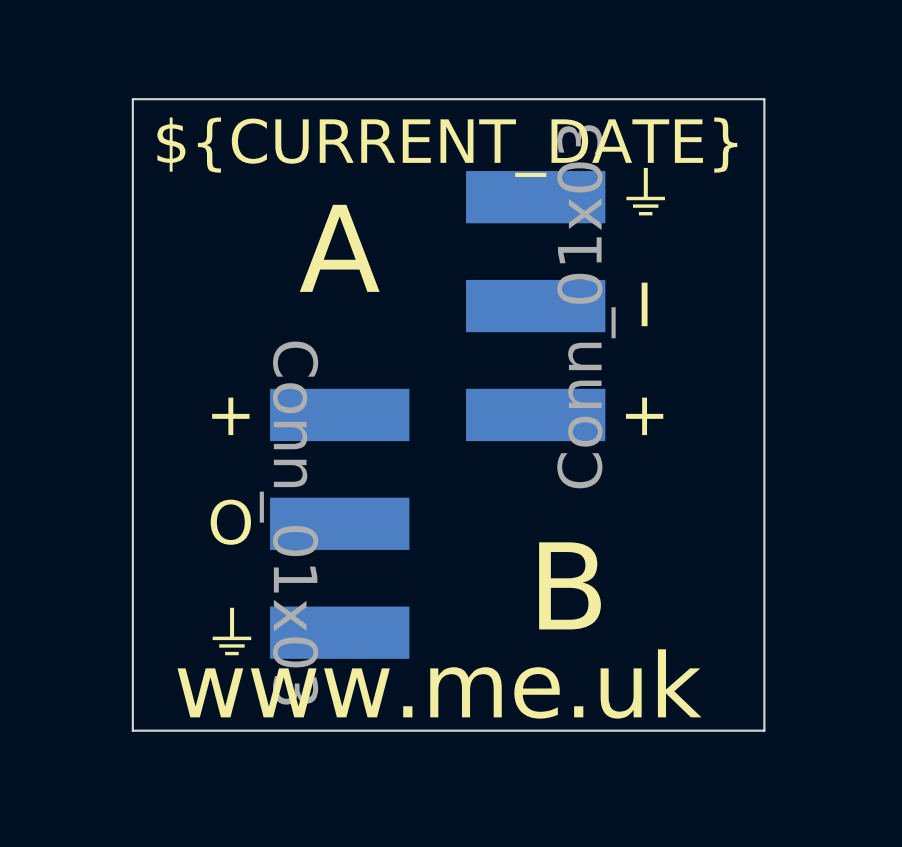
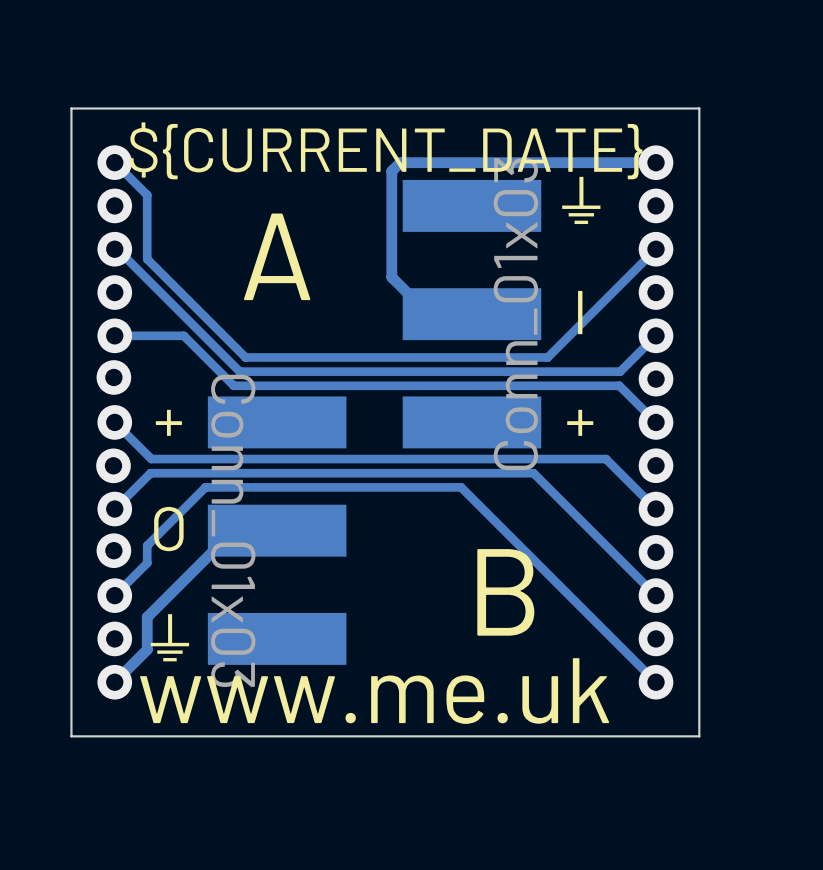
track: none -> (114, 162) (147, 195) (147, 259) (245, 357) (547, 357) (656, 249)
via: none -> (114, 162)
track: none -> (656, 162) (400, 162) (391, 171) (391, 277) (428, 314) (471, 314)
via: none -> (656, 162)
via: none -> (114, 205)
via: none -> (656, 205)
track: none -> (114, 249) (117, 249) (239, 371) (620, 371) (656, 335)
via: none -> (114, 249)
via: none -> (656, 249)
via: none -> (114, 292)
via: none -> (656, 292)
track: none -> (114, 335) (183, 335) (233, 385) (619, 385) (656, 422)
via: none -> (114, 335)
via: none -> (656, 335)
via: none -> (113, 377)
via: none -> (656, 379)
track: none -> (114, 422) (151, 459) (606, 459) (656, 509)
via: none -> (114, 422)
via: none -> (656, 422)
via: none -> (113, 465)
via: none -> (656, 465)
track: none -> (114, 509) (150, 473) (533, 473) (656, 595)
via: none -> (114, 509)
via: none -> (656, 509)
track: none -> (277, 530) (233, 530) (147, 617) (147, 649) (114, 682)
via: none -> (113, 550)
via: none -> (656, 552)
track: none -> (114, 595) (147, 563) (147, 545) (205, 487) (461, 487) (656, 682)
via: none -> (114, 595)
via: none -> (656, 595)
via: none -> (114, 638)
via: none -> (656, 638)
via: none -> (114, 682)
via: none -> (656, 682)

